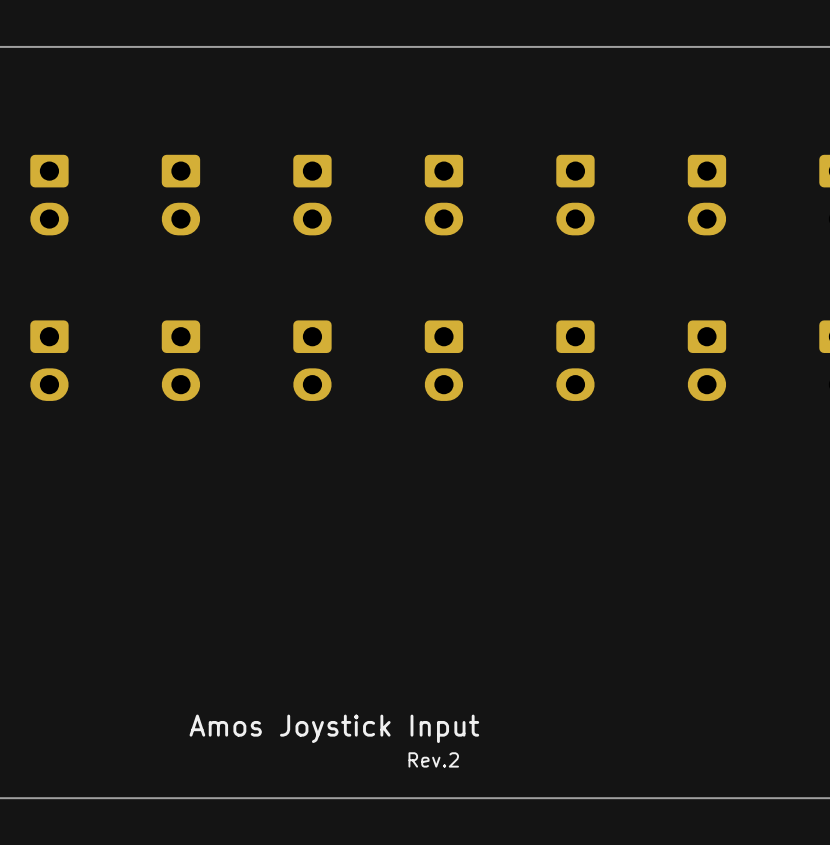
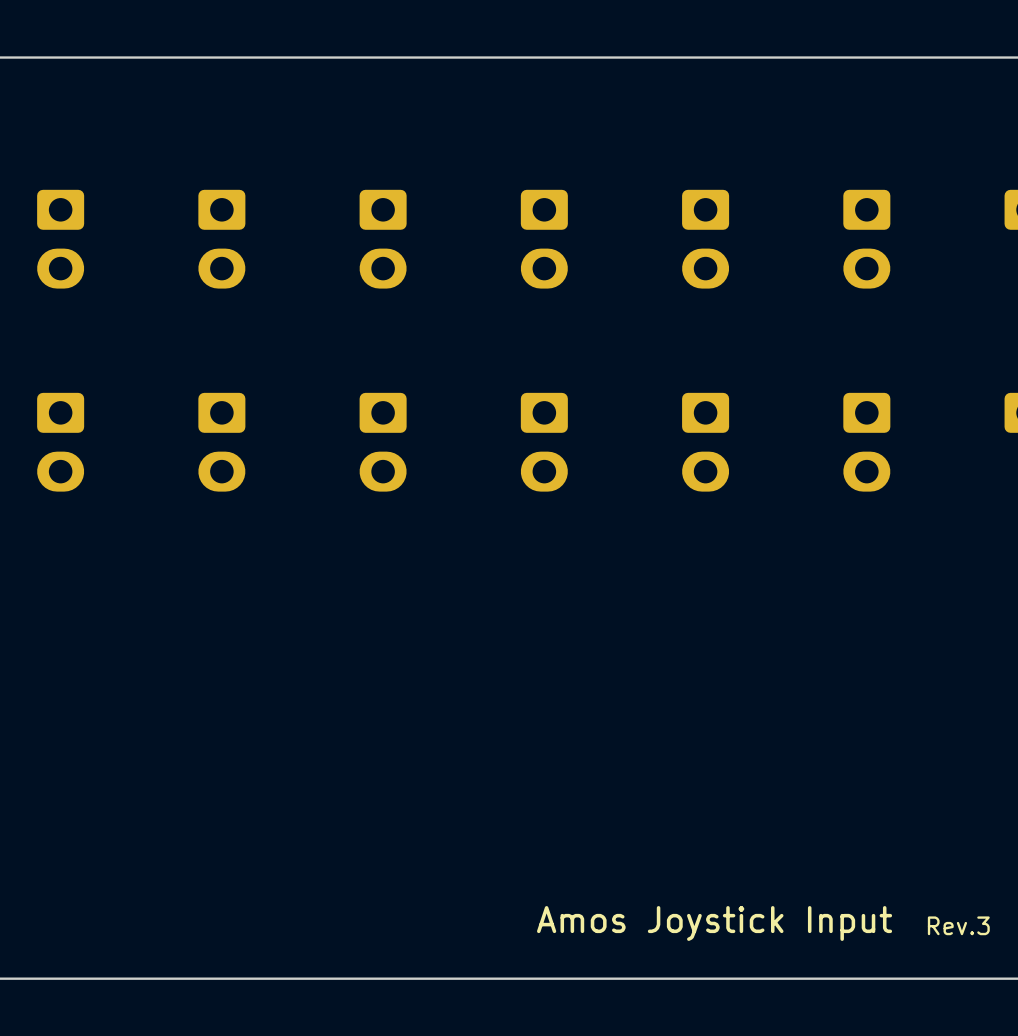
text position: Amos Joystick Input (334, 728) -> Amos Joystick Input (714, 923)
text: none -> Rev.3 (958, 925)
text: Rev.2 (433, 759) -> none

